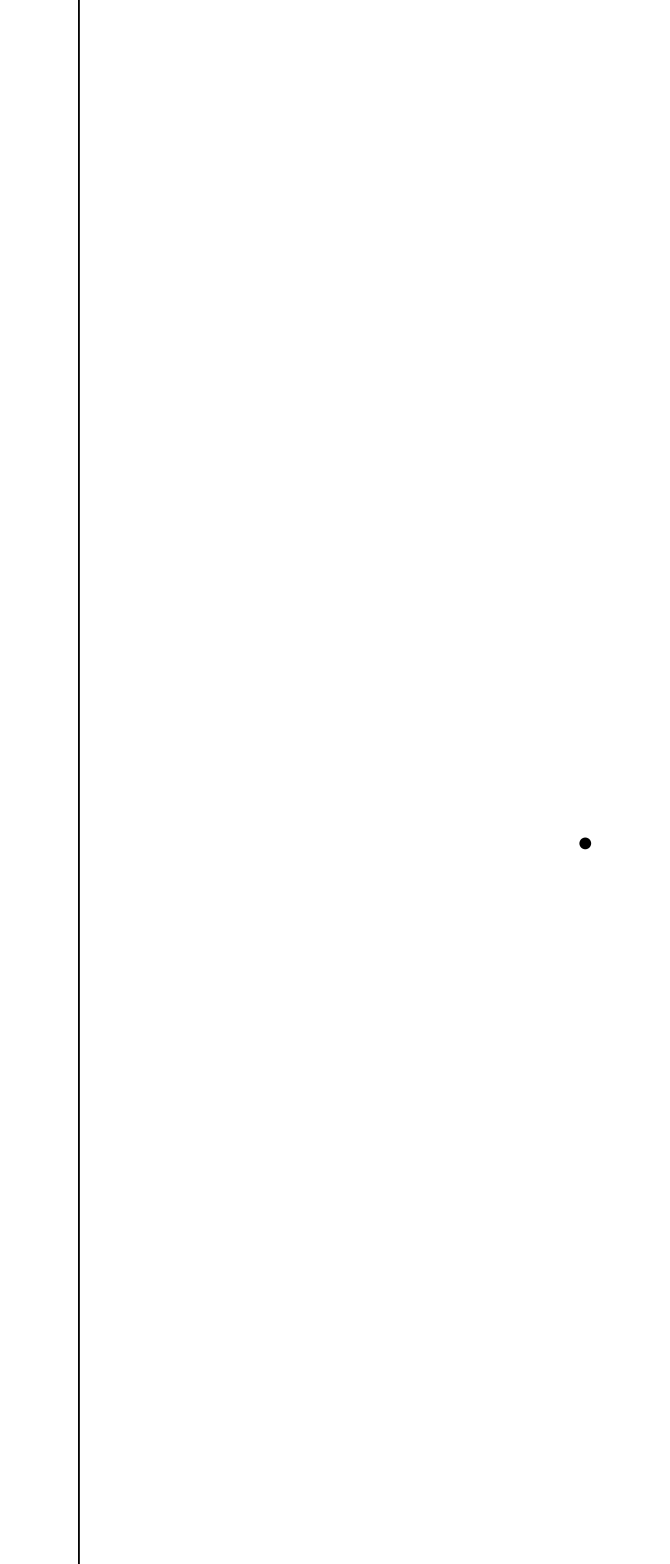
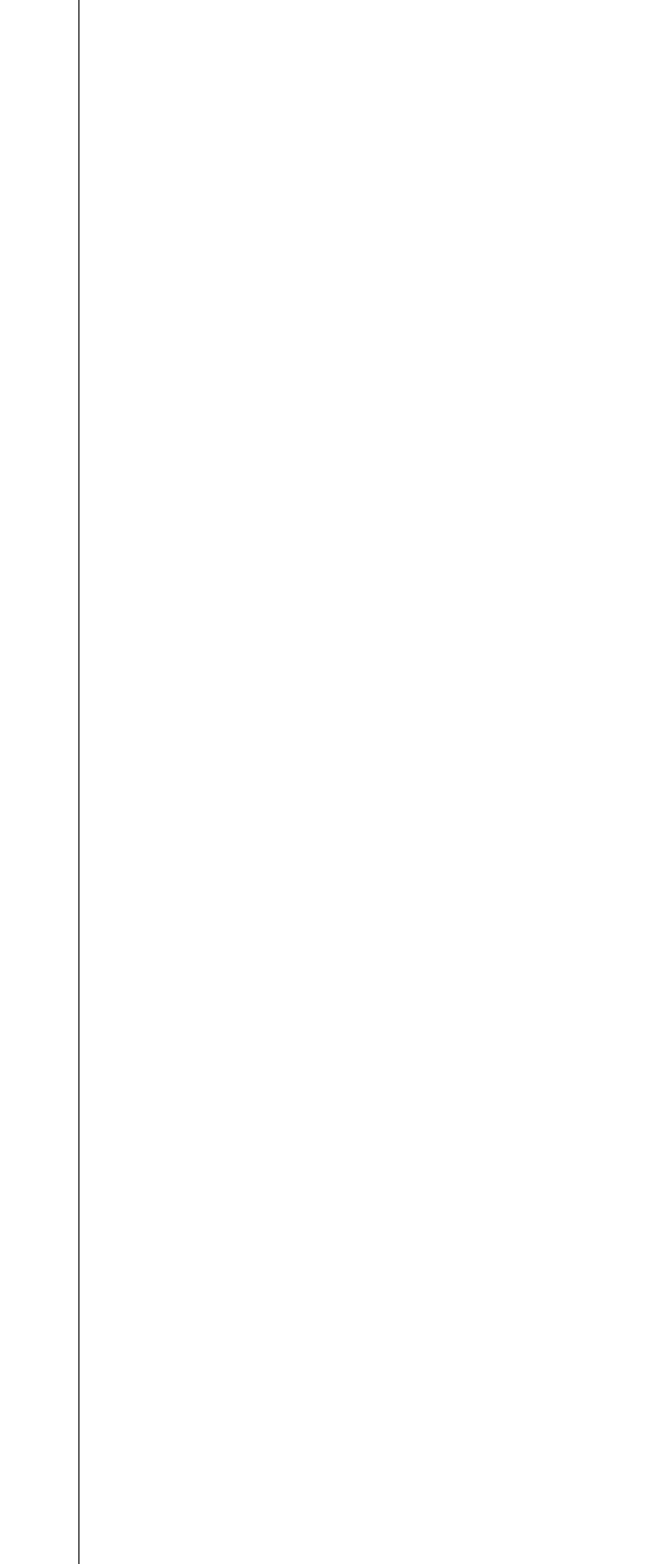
part: (585, 843) -> none

